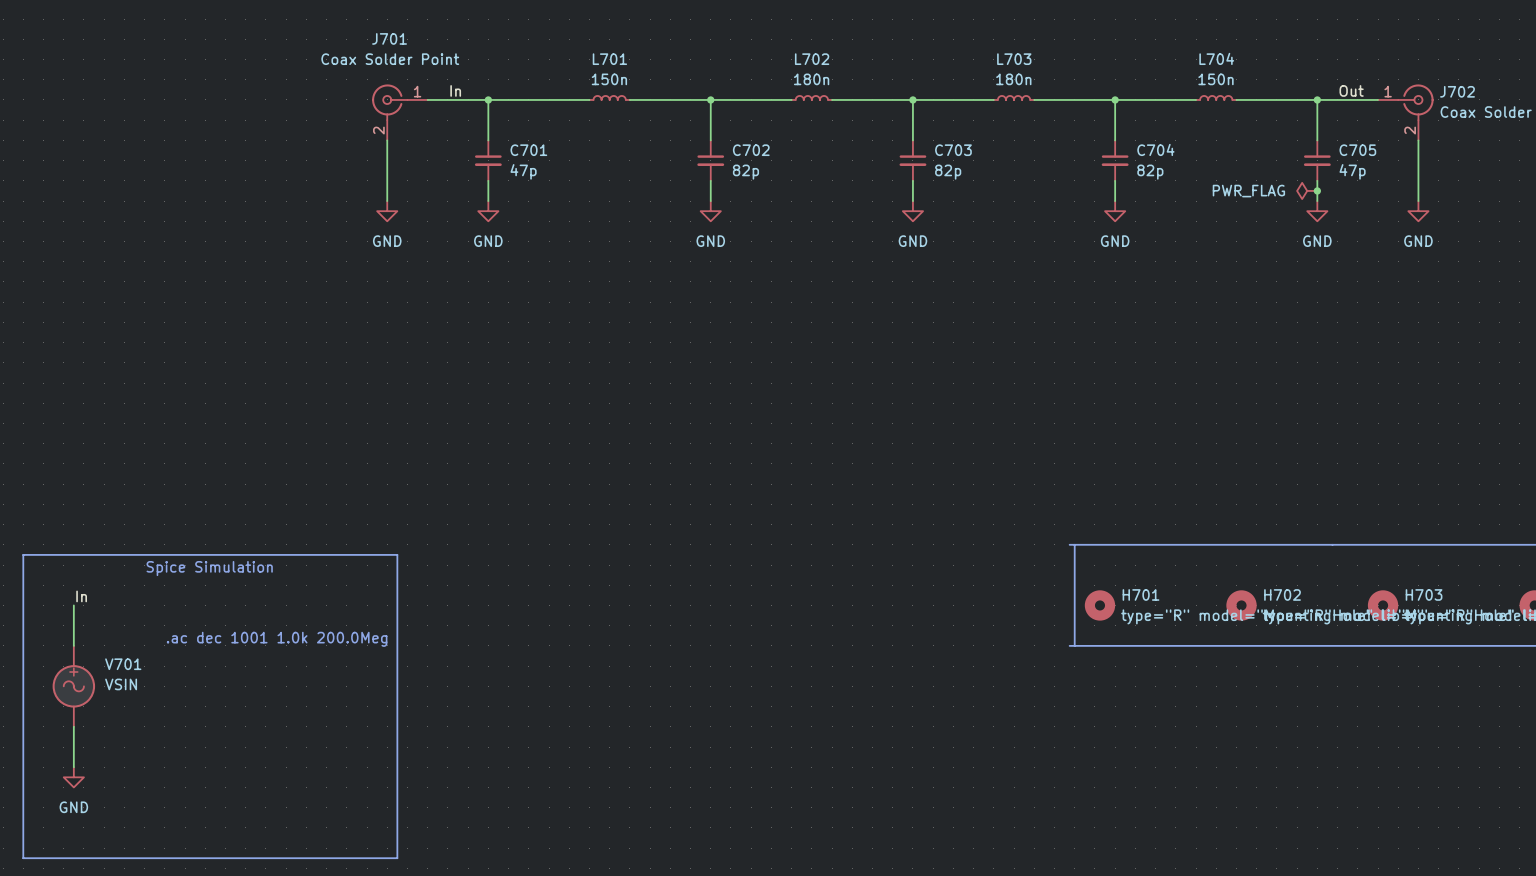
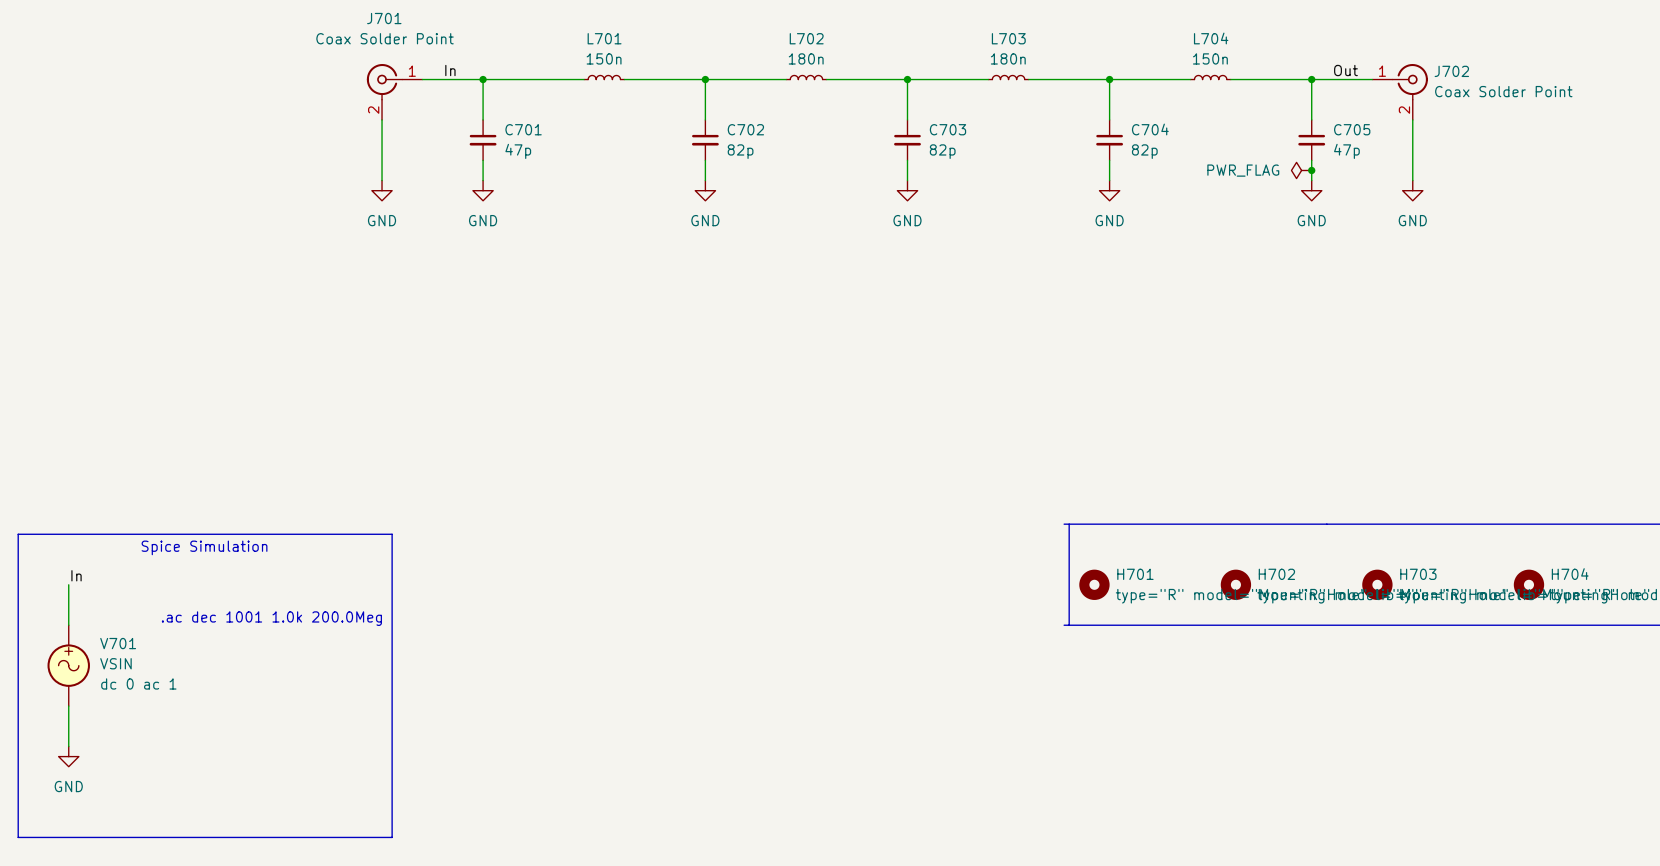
V701 text: none -> dc 0 ac 1 (138, 683)

